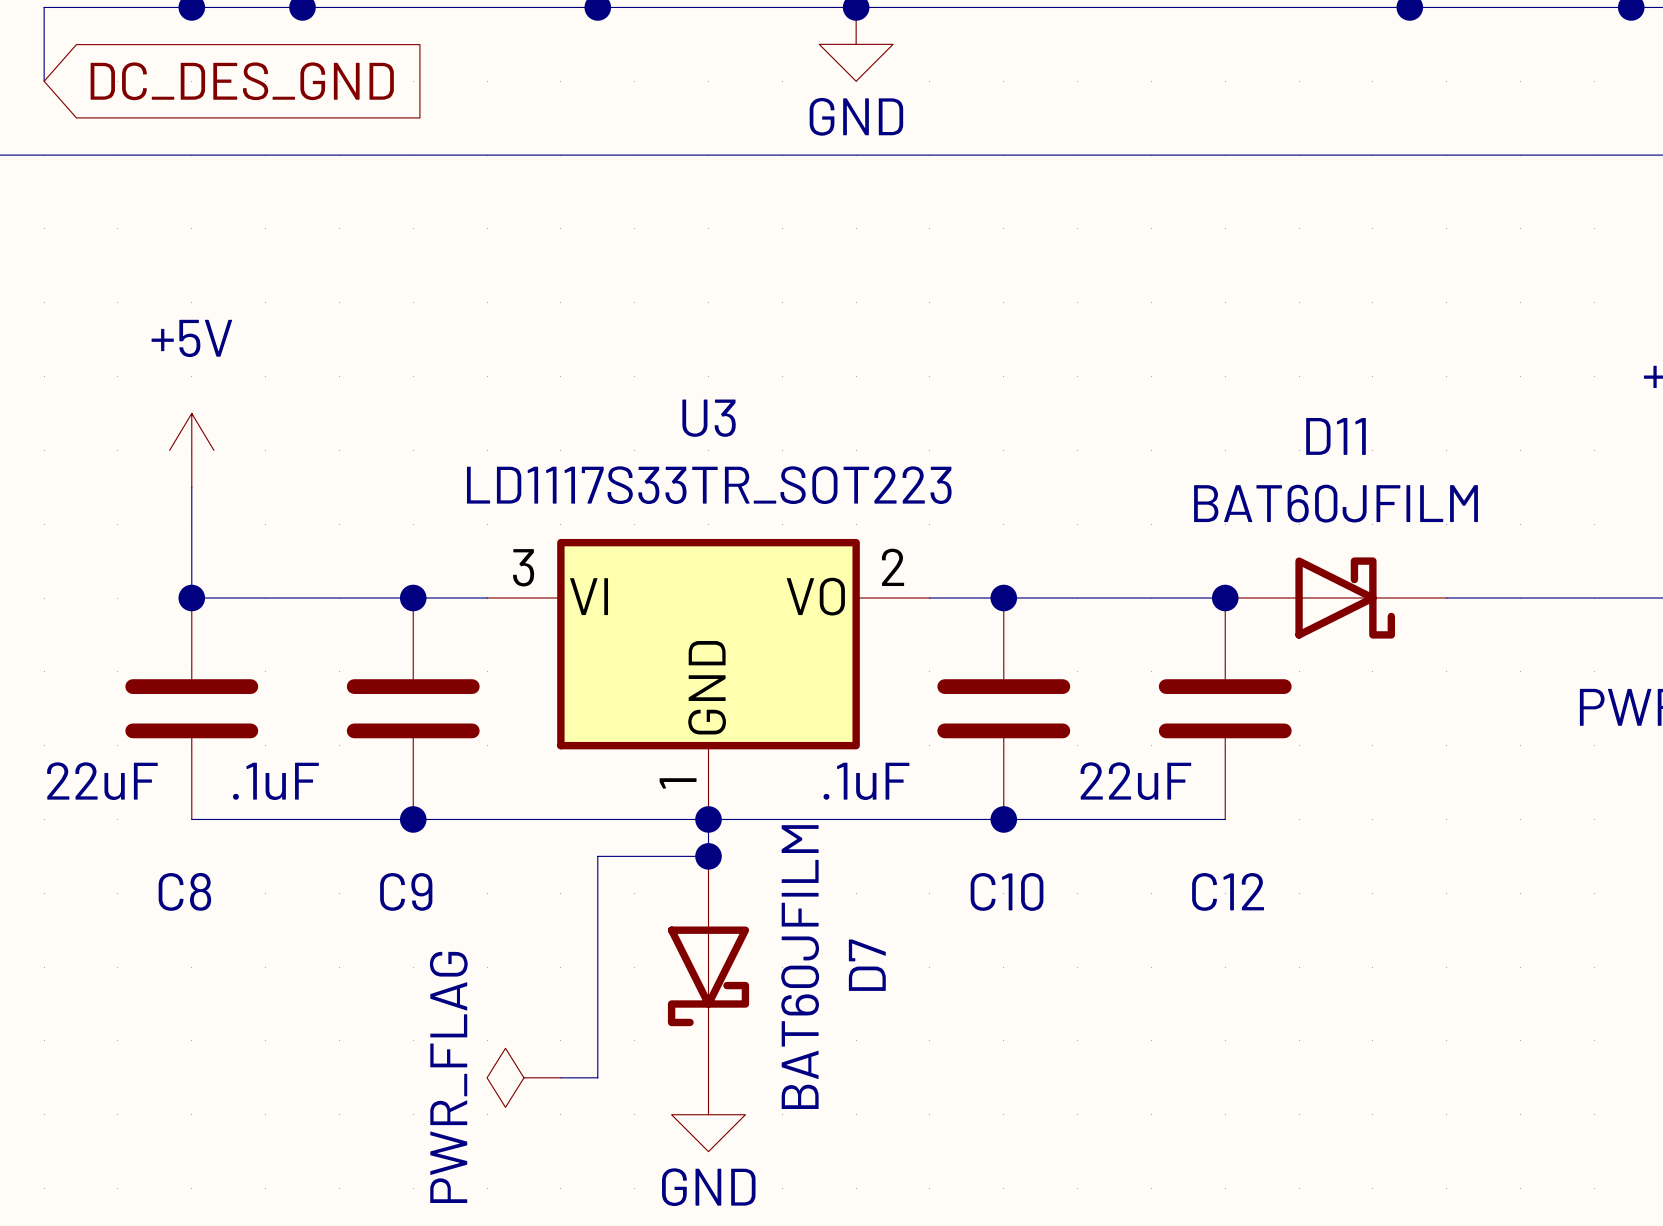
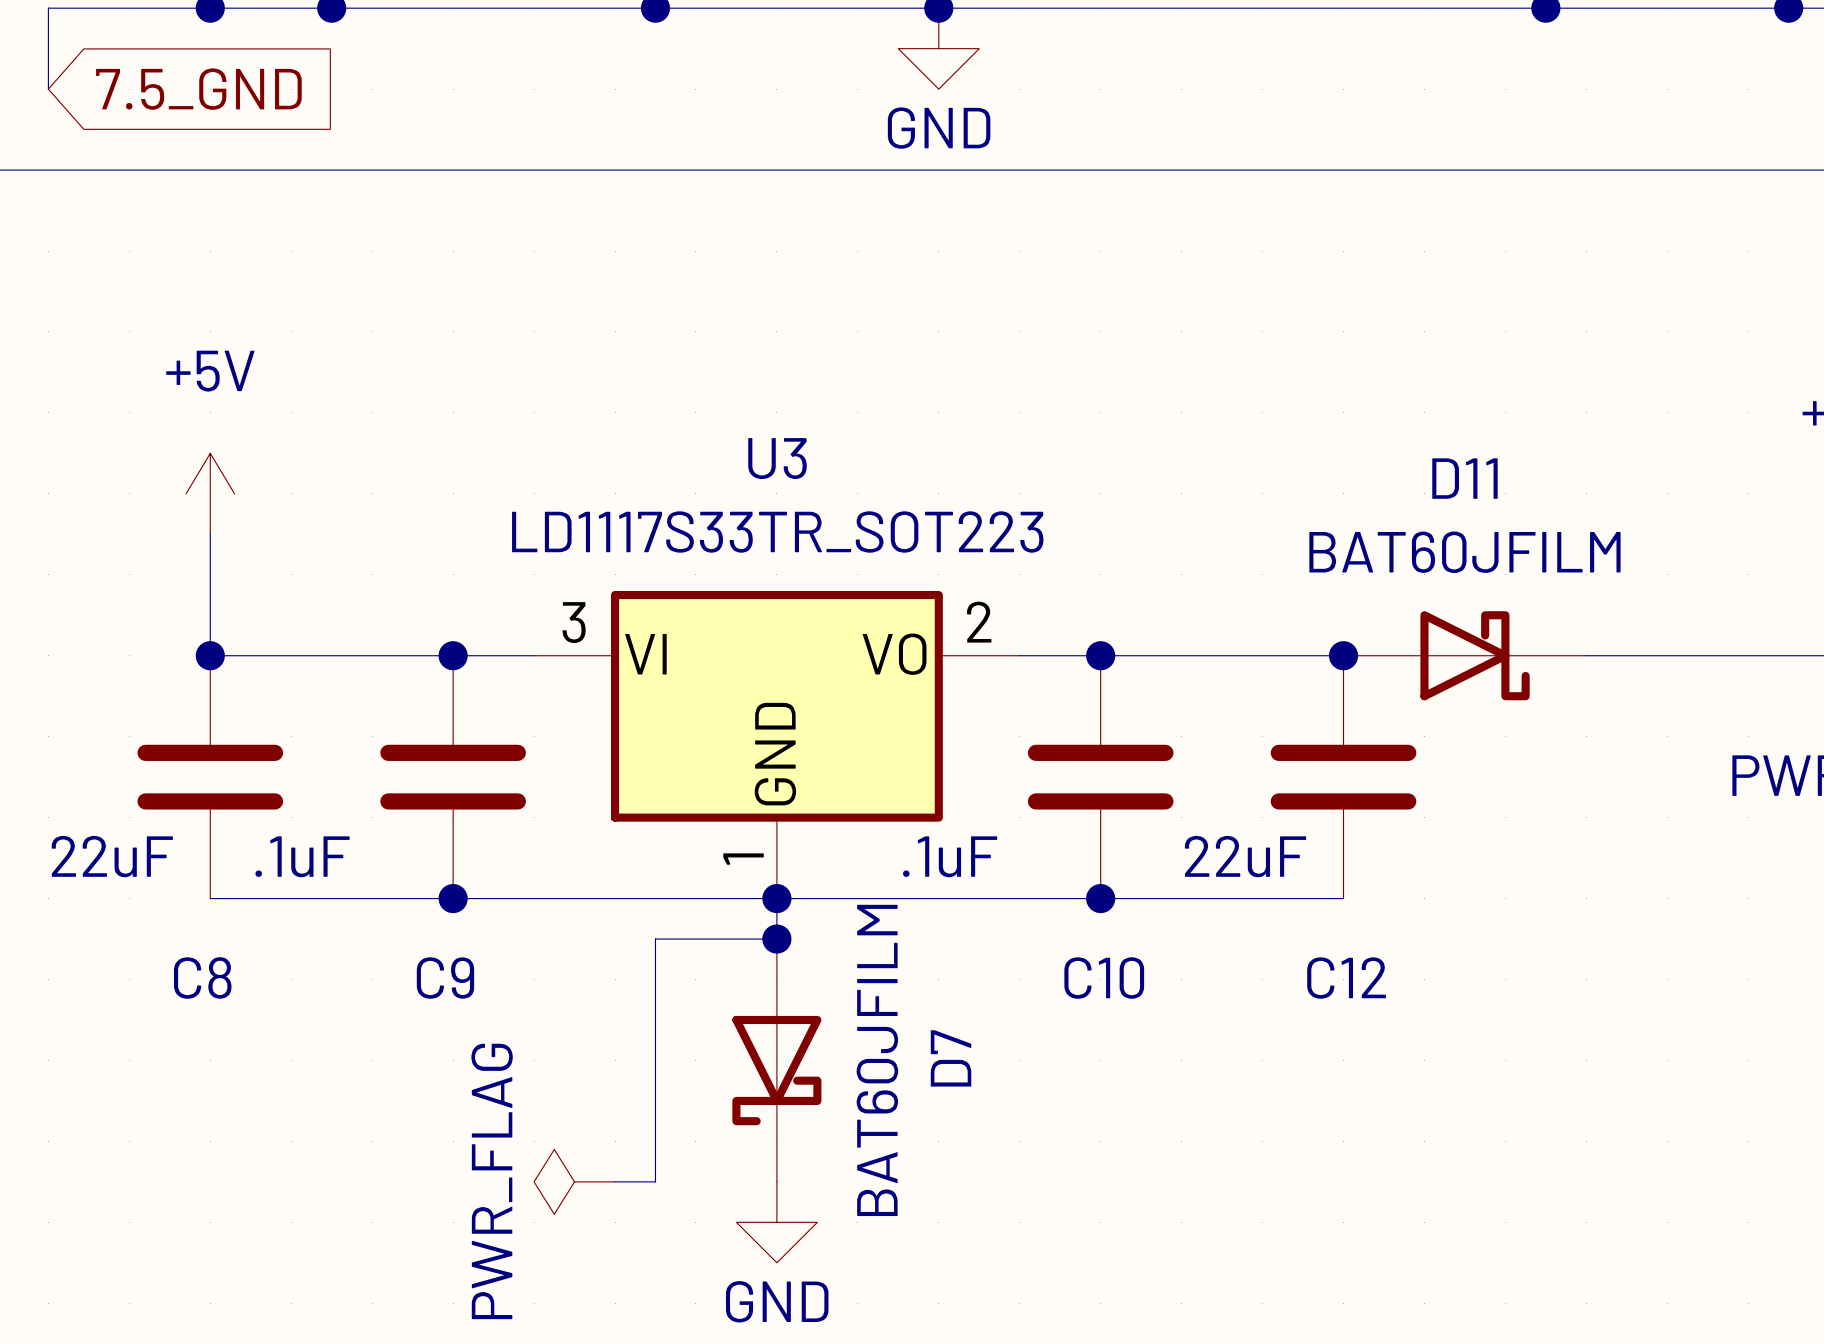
global label: DC_DES_GND (242, 81) -> 7.5_GND (198, 89)

